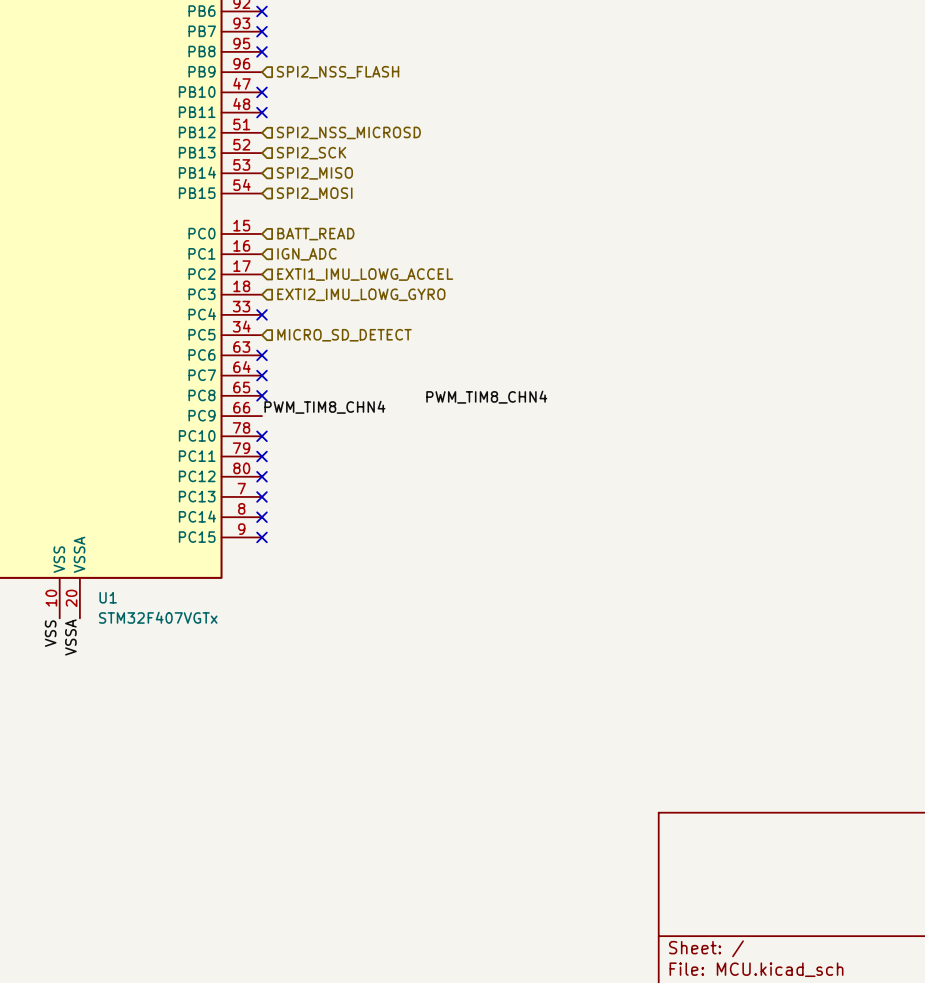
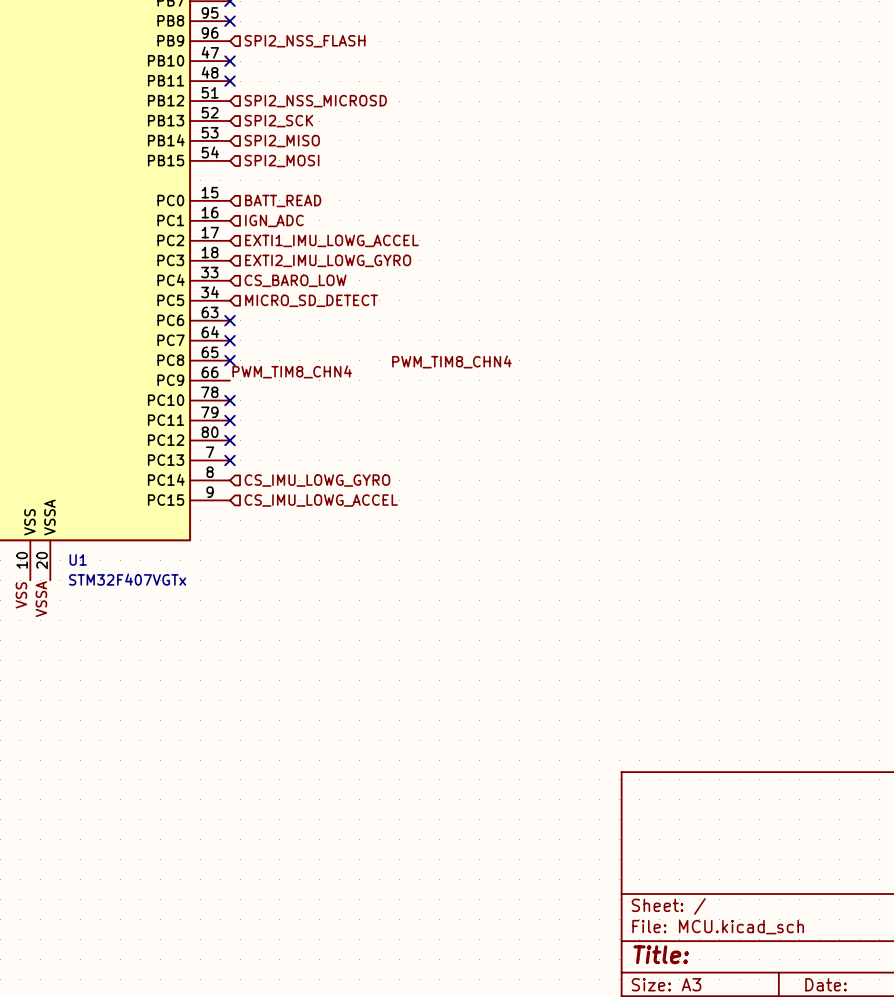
no-connect mark: (261, 314) -> none
hierarchical label: none -> CS_BARO_LOW (295, 280)
no-connect mark: (261, 517) -> none
hierarchical label: none -> CS_IMU_LOWG_GYRO (317, 480)
no-connect mark: (261, 537) -> none
hierarchical label: none -> CS_IMU_LOWG_ACCEL (321, 500)

